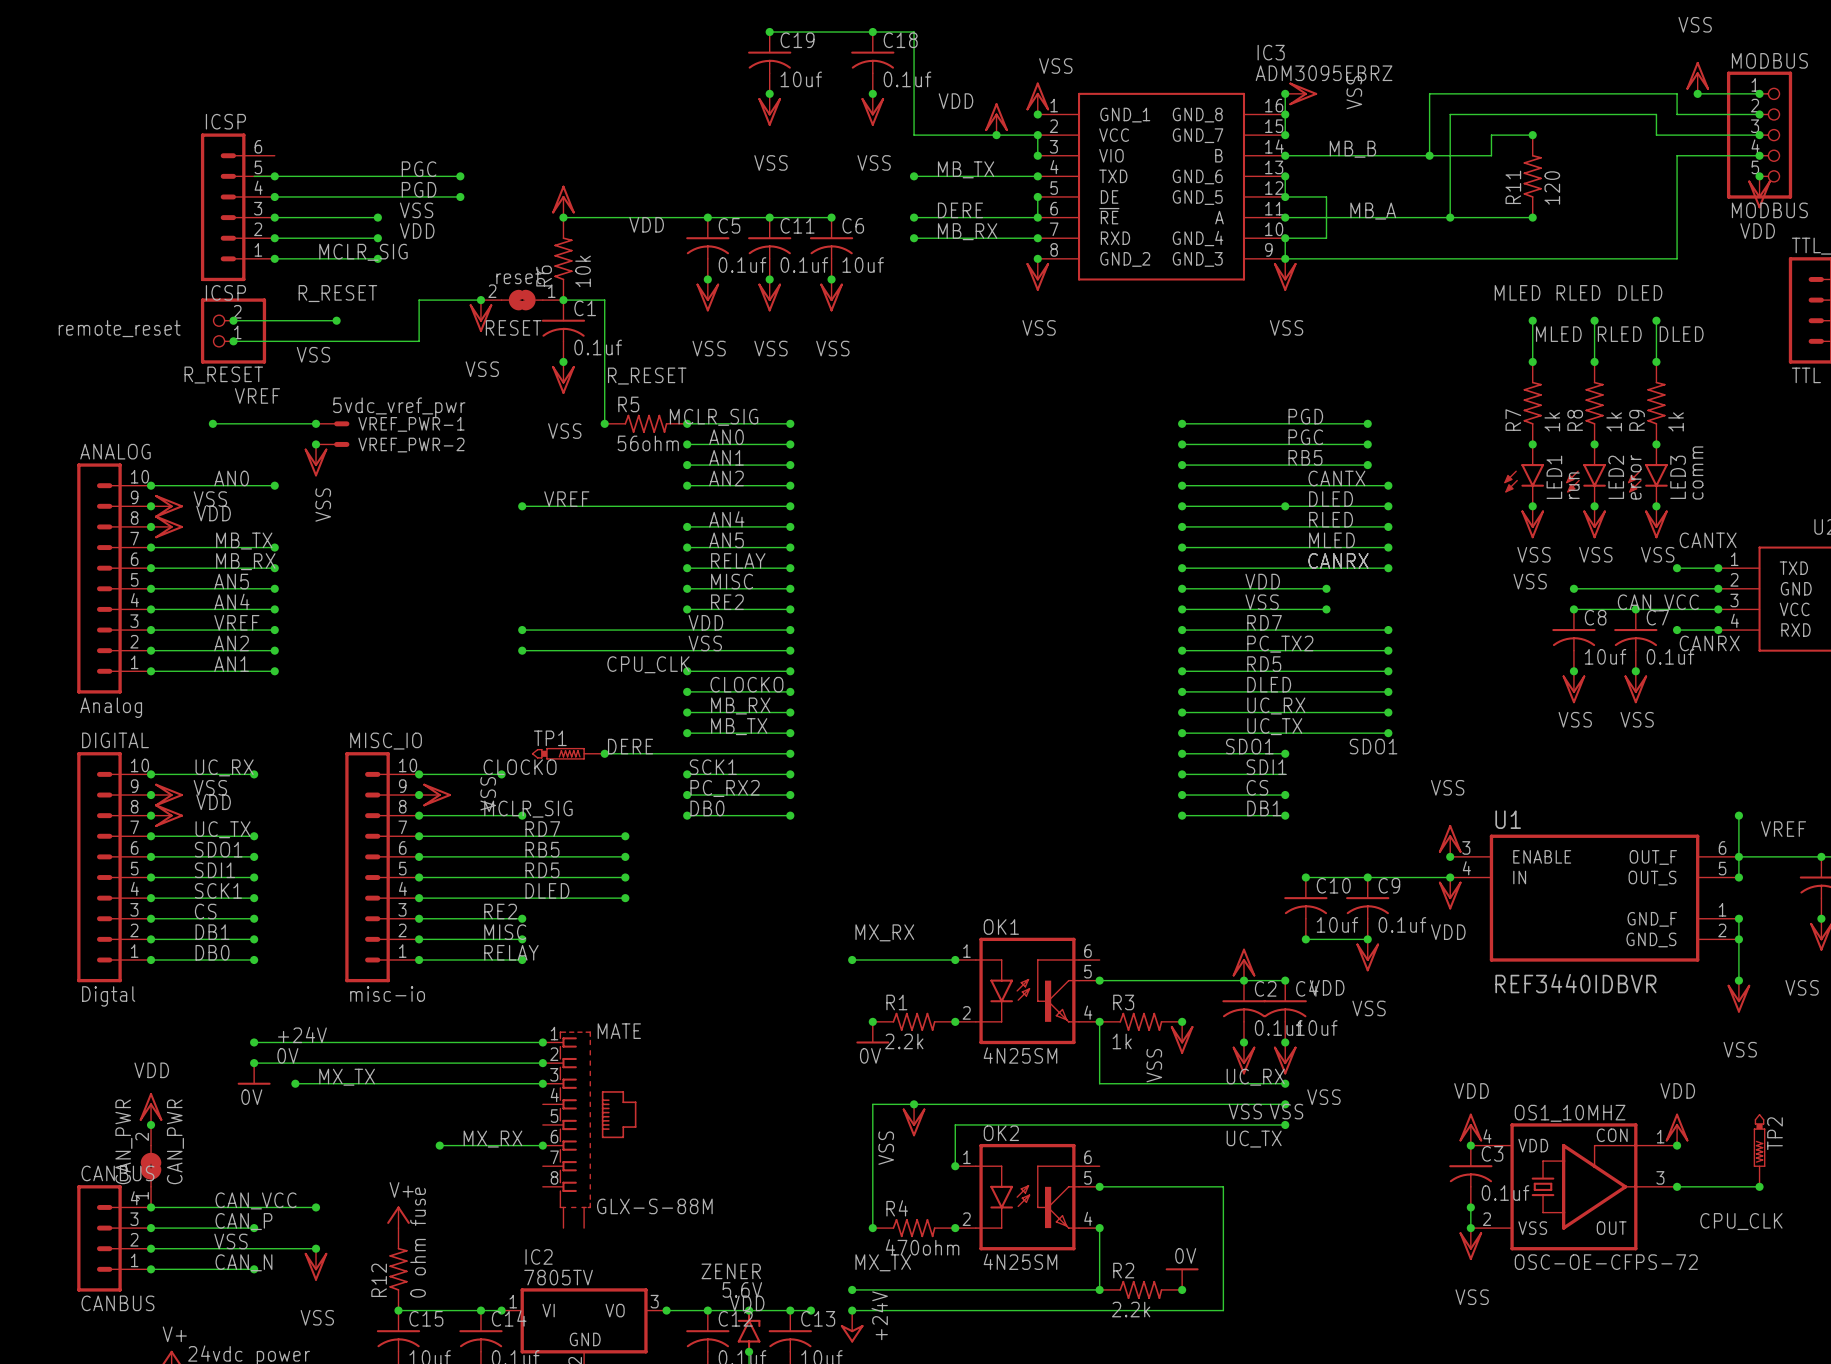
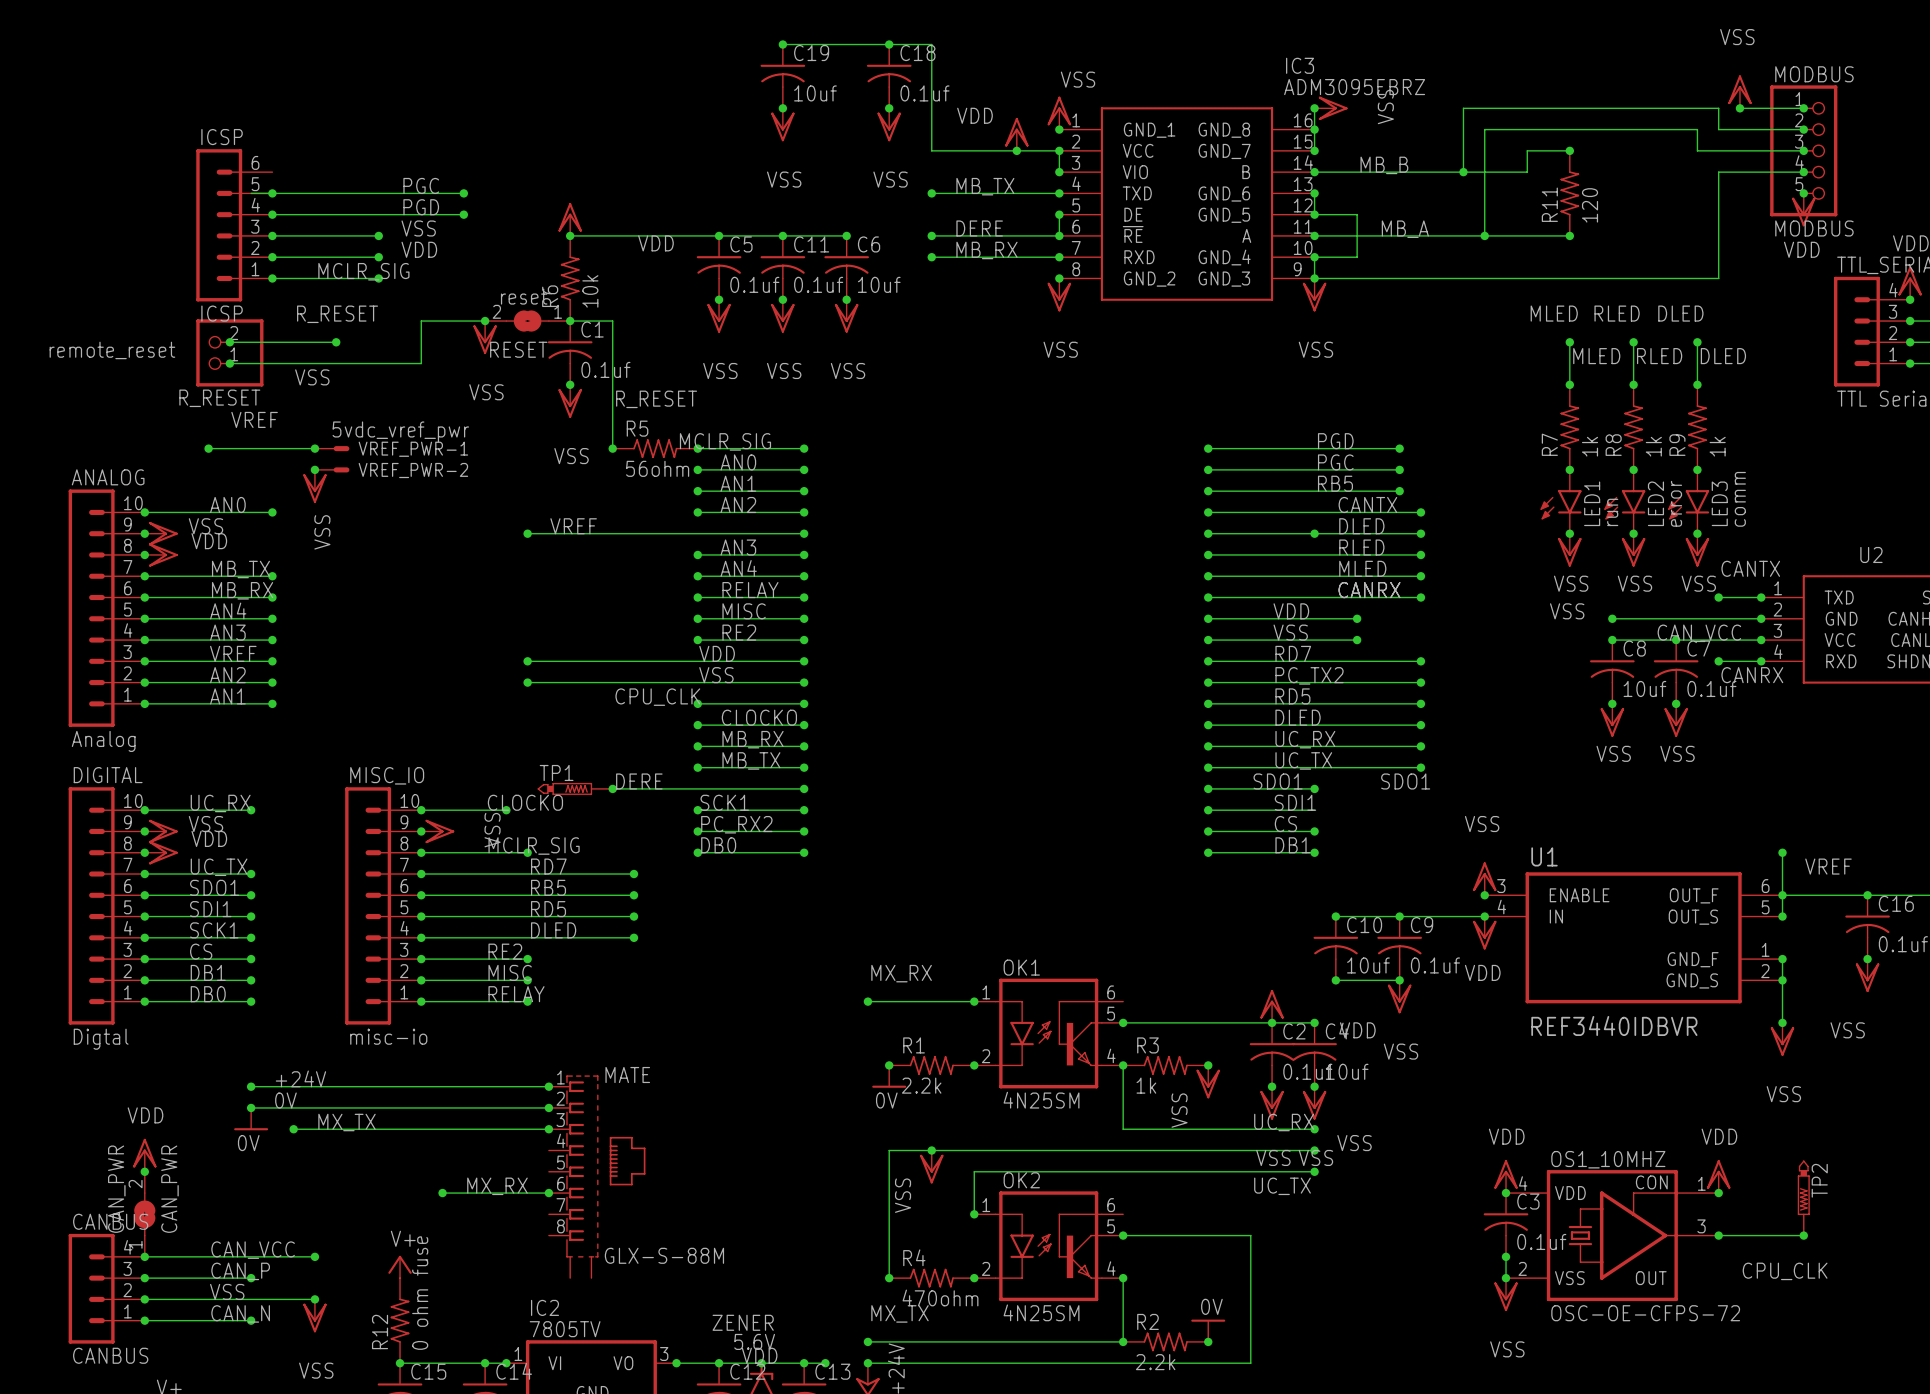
label: AN4 (726, 519) -> AN3 (738, 547)
label: AN5 (726, 540) -> AN4 (738, 568)
label: AN5 (231, 581) -> AN4 (228, 610)
label: AN4 (231, 601) -> AN3 (227, 632)

